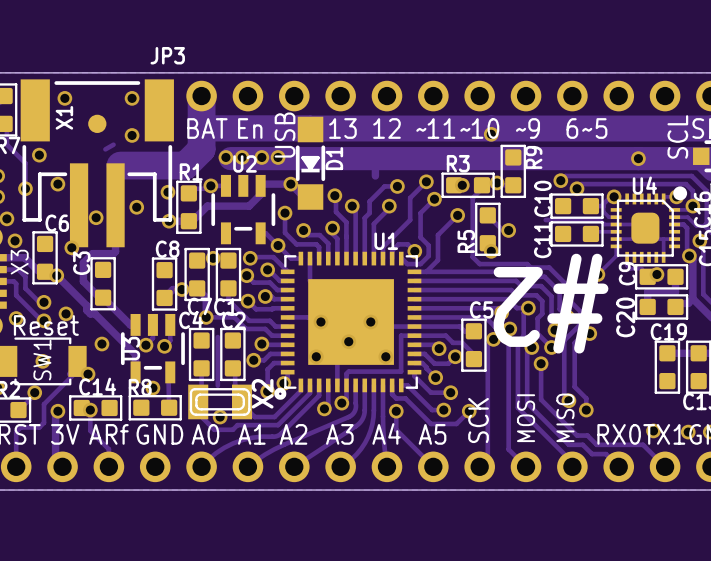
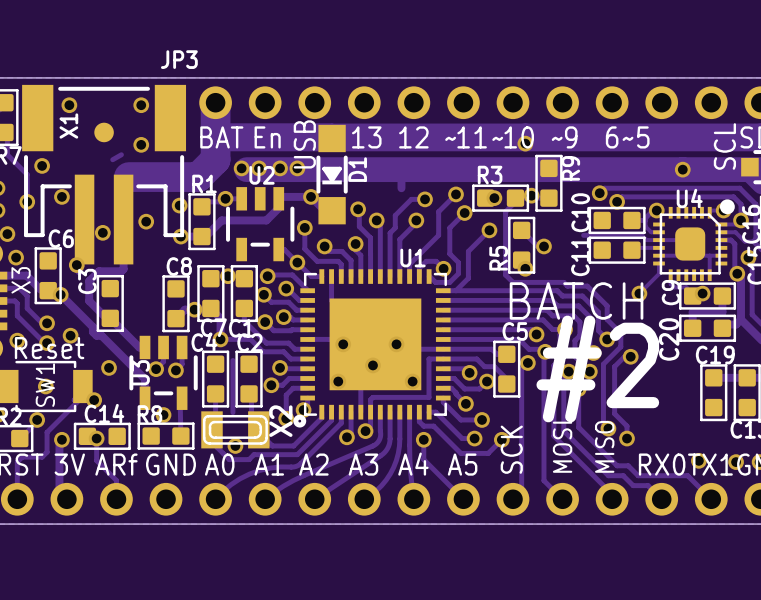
text: none -> BATCH (576, 300)
text rotation: 0° (551, 303) -> 180° (597, 368)

